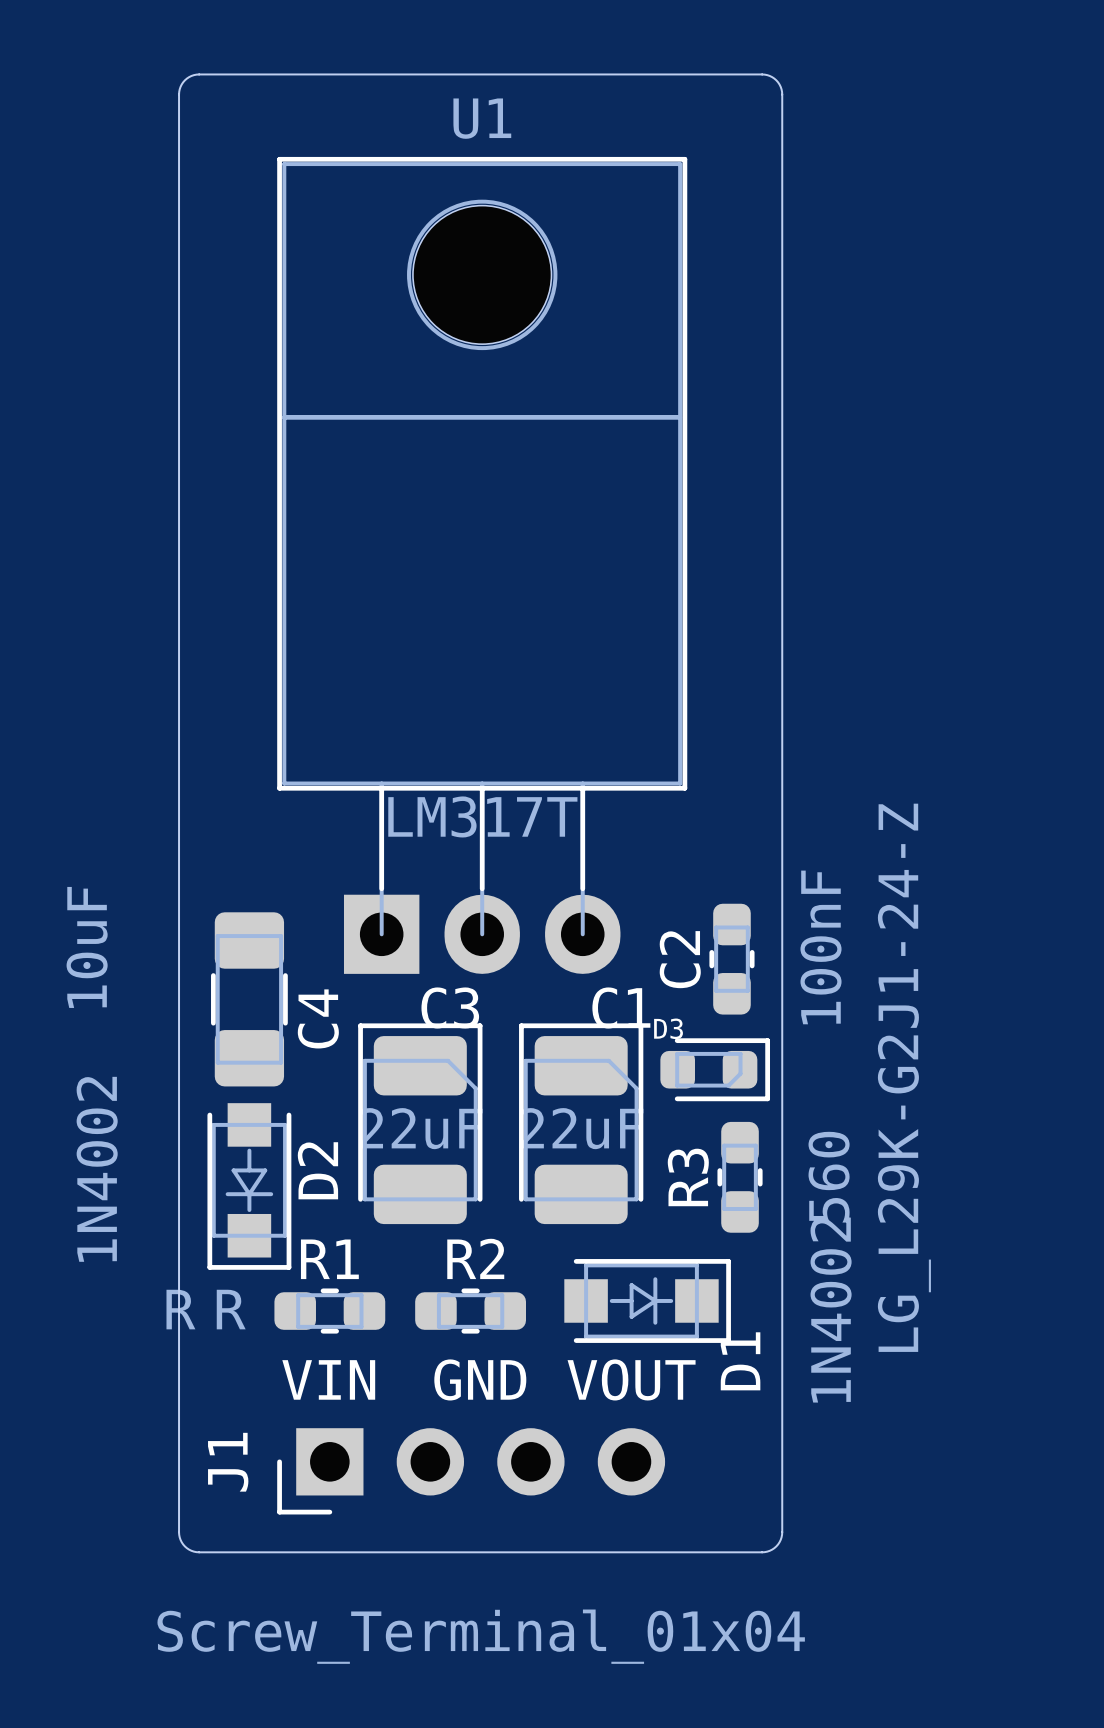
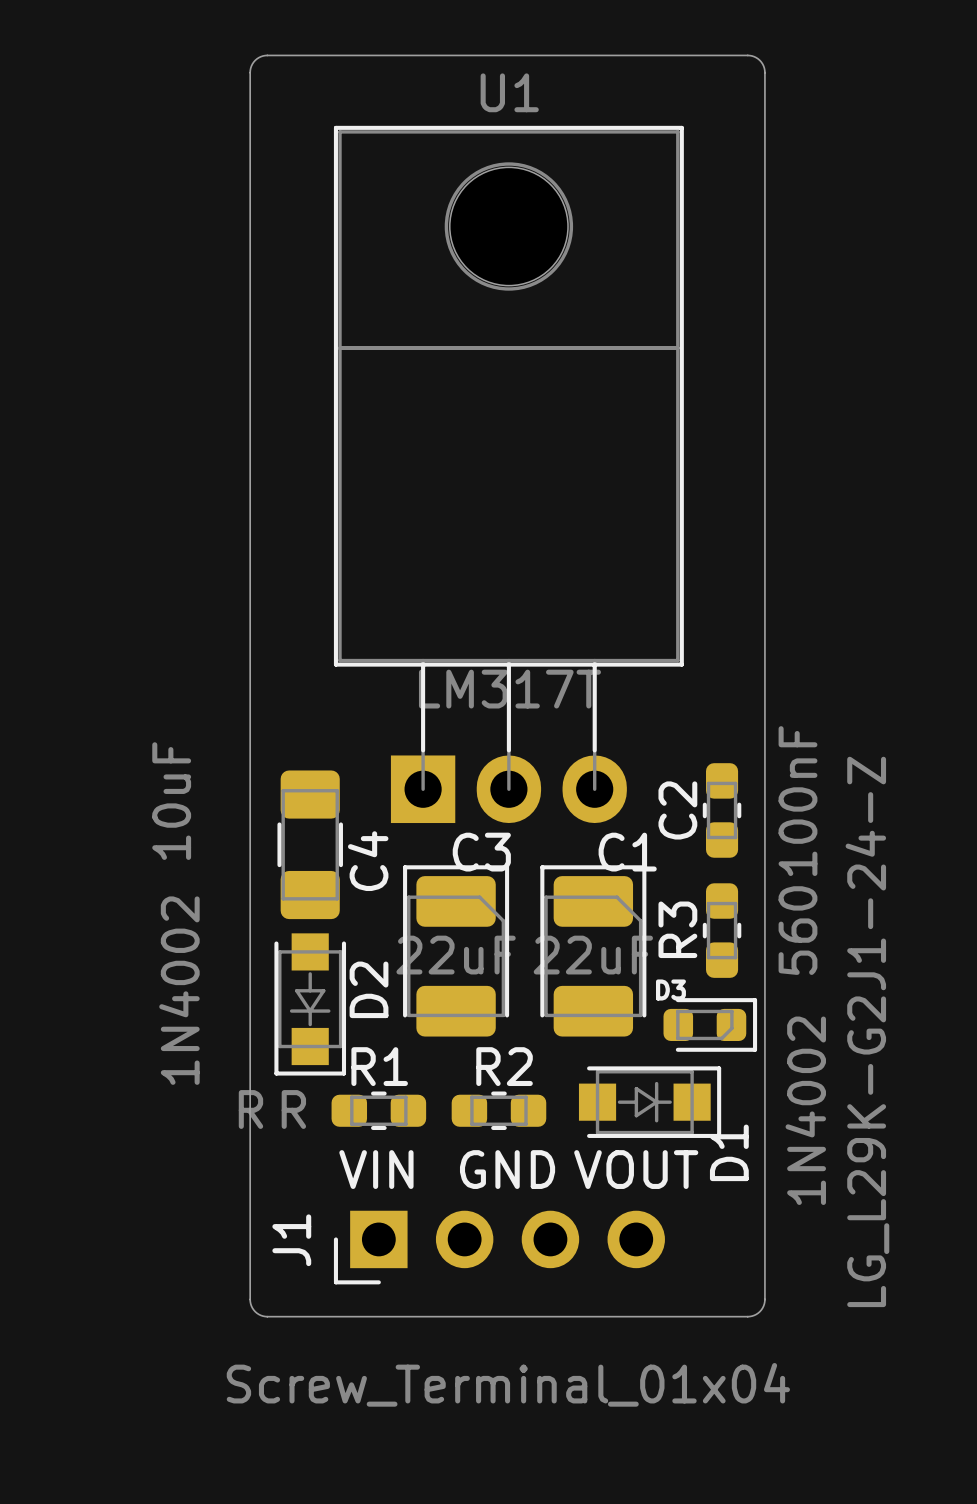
D3 position: (715, 1069) -> (710, 1024)
R3 position: (740, 1177) -> (722, 930)

